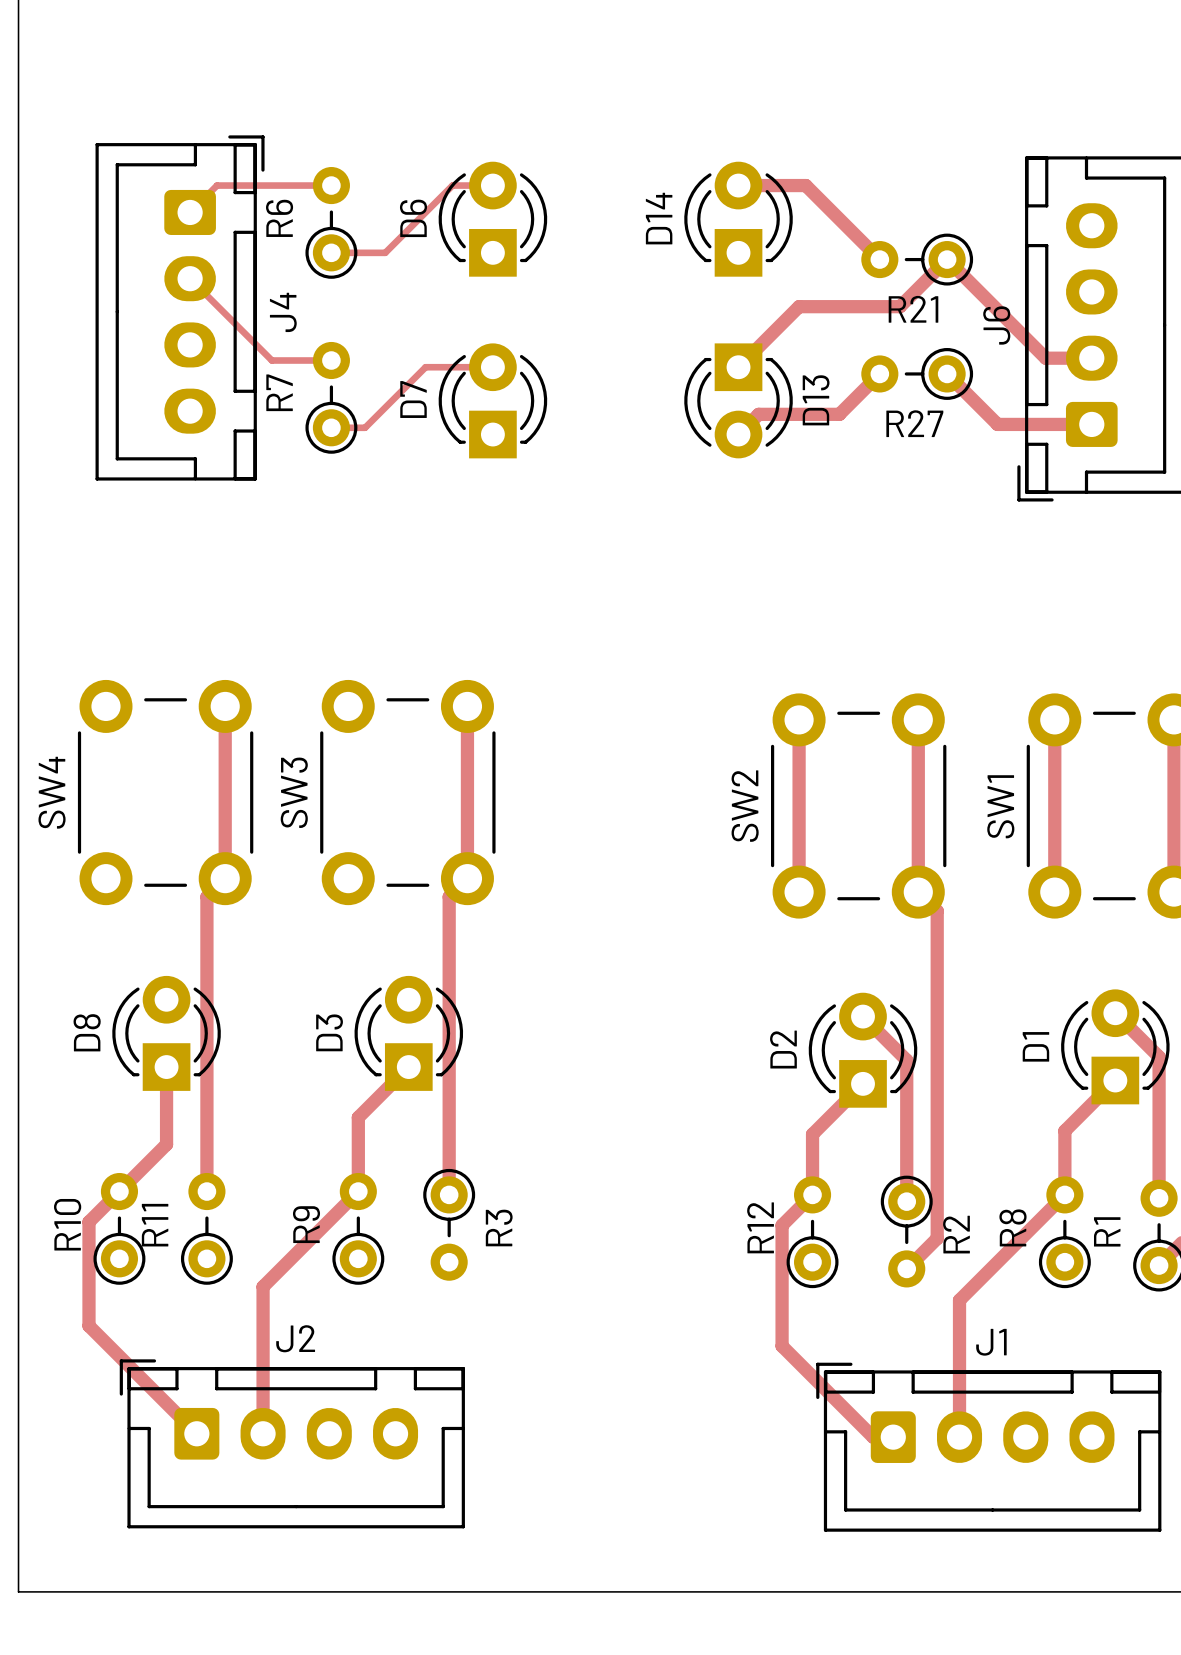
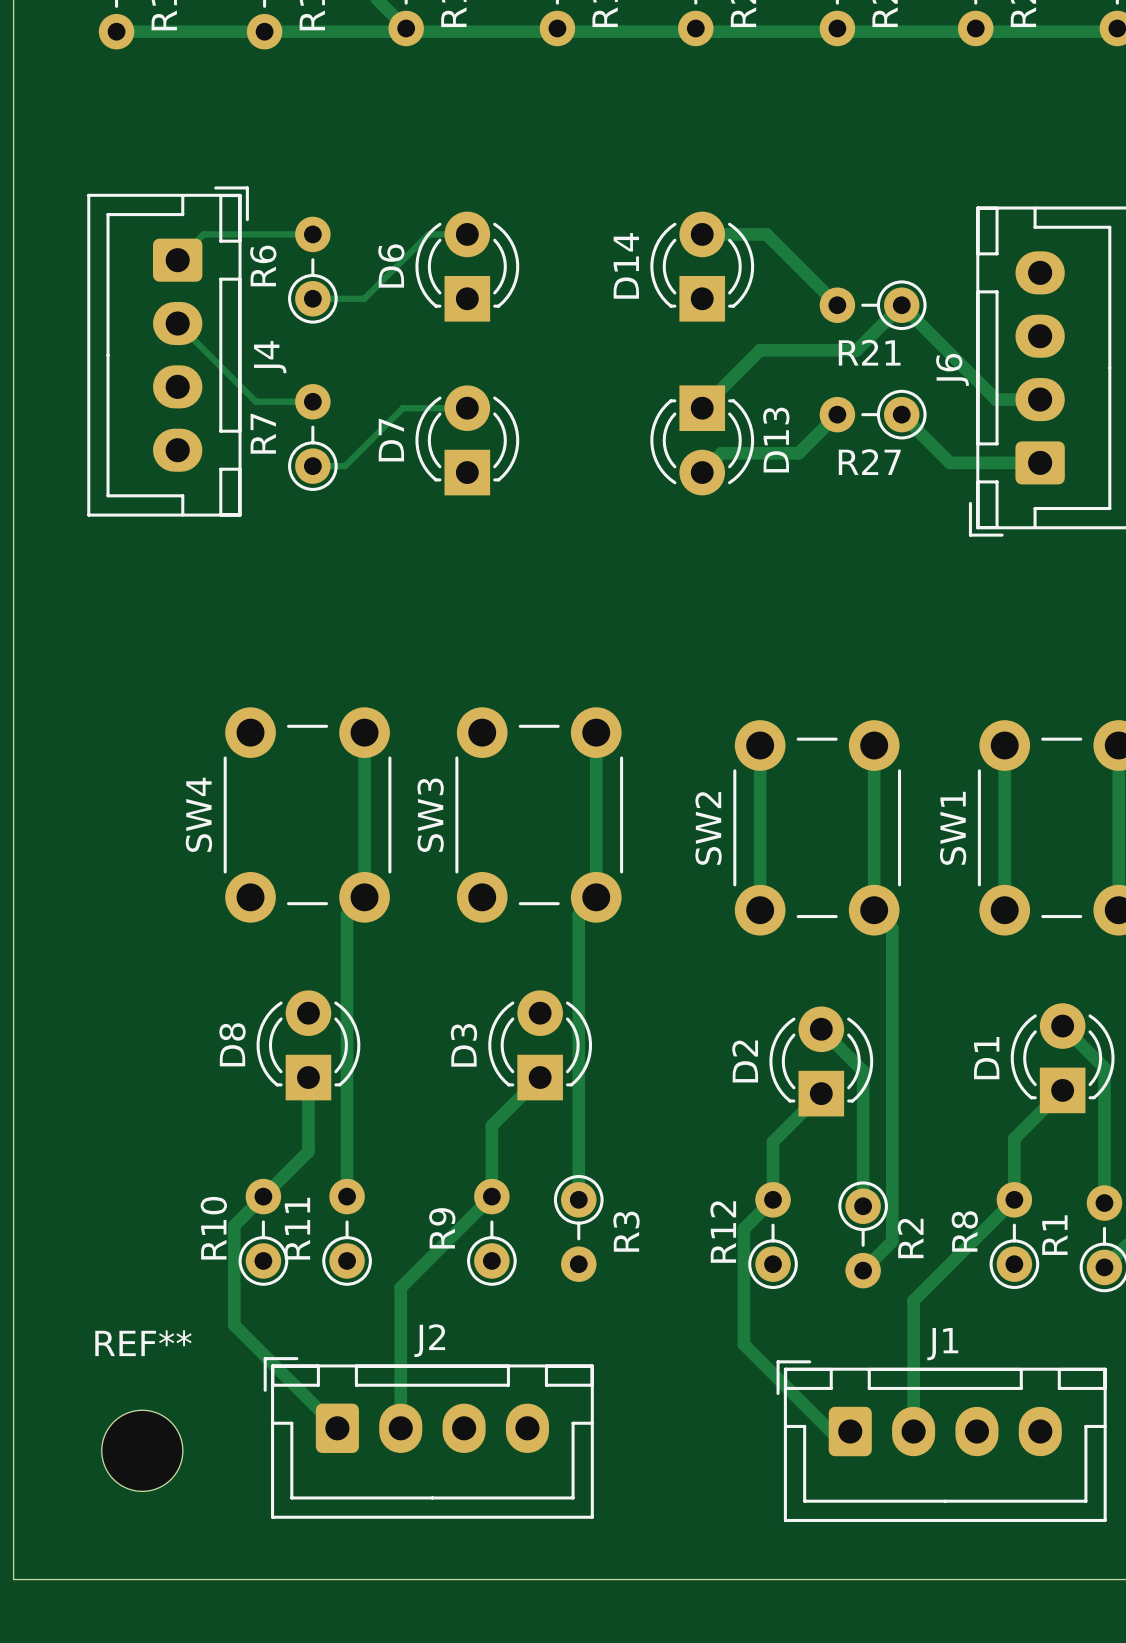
track: (225, 706) (225, 878) (206, 896) (206, 1191) -> (364, 732) (364, 897) (347, 914) (347, 1196)
track: (467, 706) (467, 878) (449, 896) (449, 1194) -> (596, 732) (596, 897) (578, 914) (578, 1199)
SW4 position: (165, 792) -> (307, 814)
SW3 position: (407, 792) -> (539, 814)
D8 footprint: [112, 975, 221, 1091] -> [256, 990, 361, 1101]
D3 position: (408, 1033) -> (540, 1045)
track: (408, 1067) (358, 1117) (358, 1191) (263, 1286) (263, 1433) -> (540, 1077) (491, 1125) (491, 1196) (400, 1287) (400, 1428)
track: (166, 1147) (166, 1067) (166, 1144) (88, 1222) (88, 1325) (196, 1433) -> (308, 1154) (308, 1077) (308, 1151) (234, 1225) (234, 1325) (337, 1428)
R3 position: (449, 1224) -> (578, 1228)
R10 position: (119, 1228) -> (263, 1232)
R11 position: (206, 1228) -> (347, 1232)
R9 position: (358, 1228) -> (491, 1232)
J2 position: (292, 1443) -> (428, 1437)
REF**: none -> (142, 1450)

